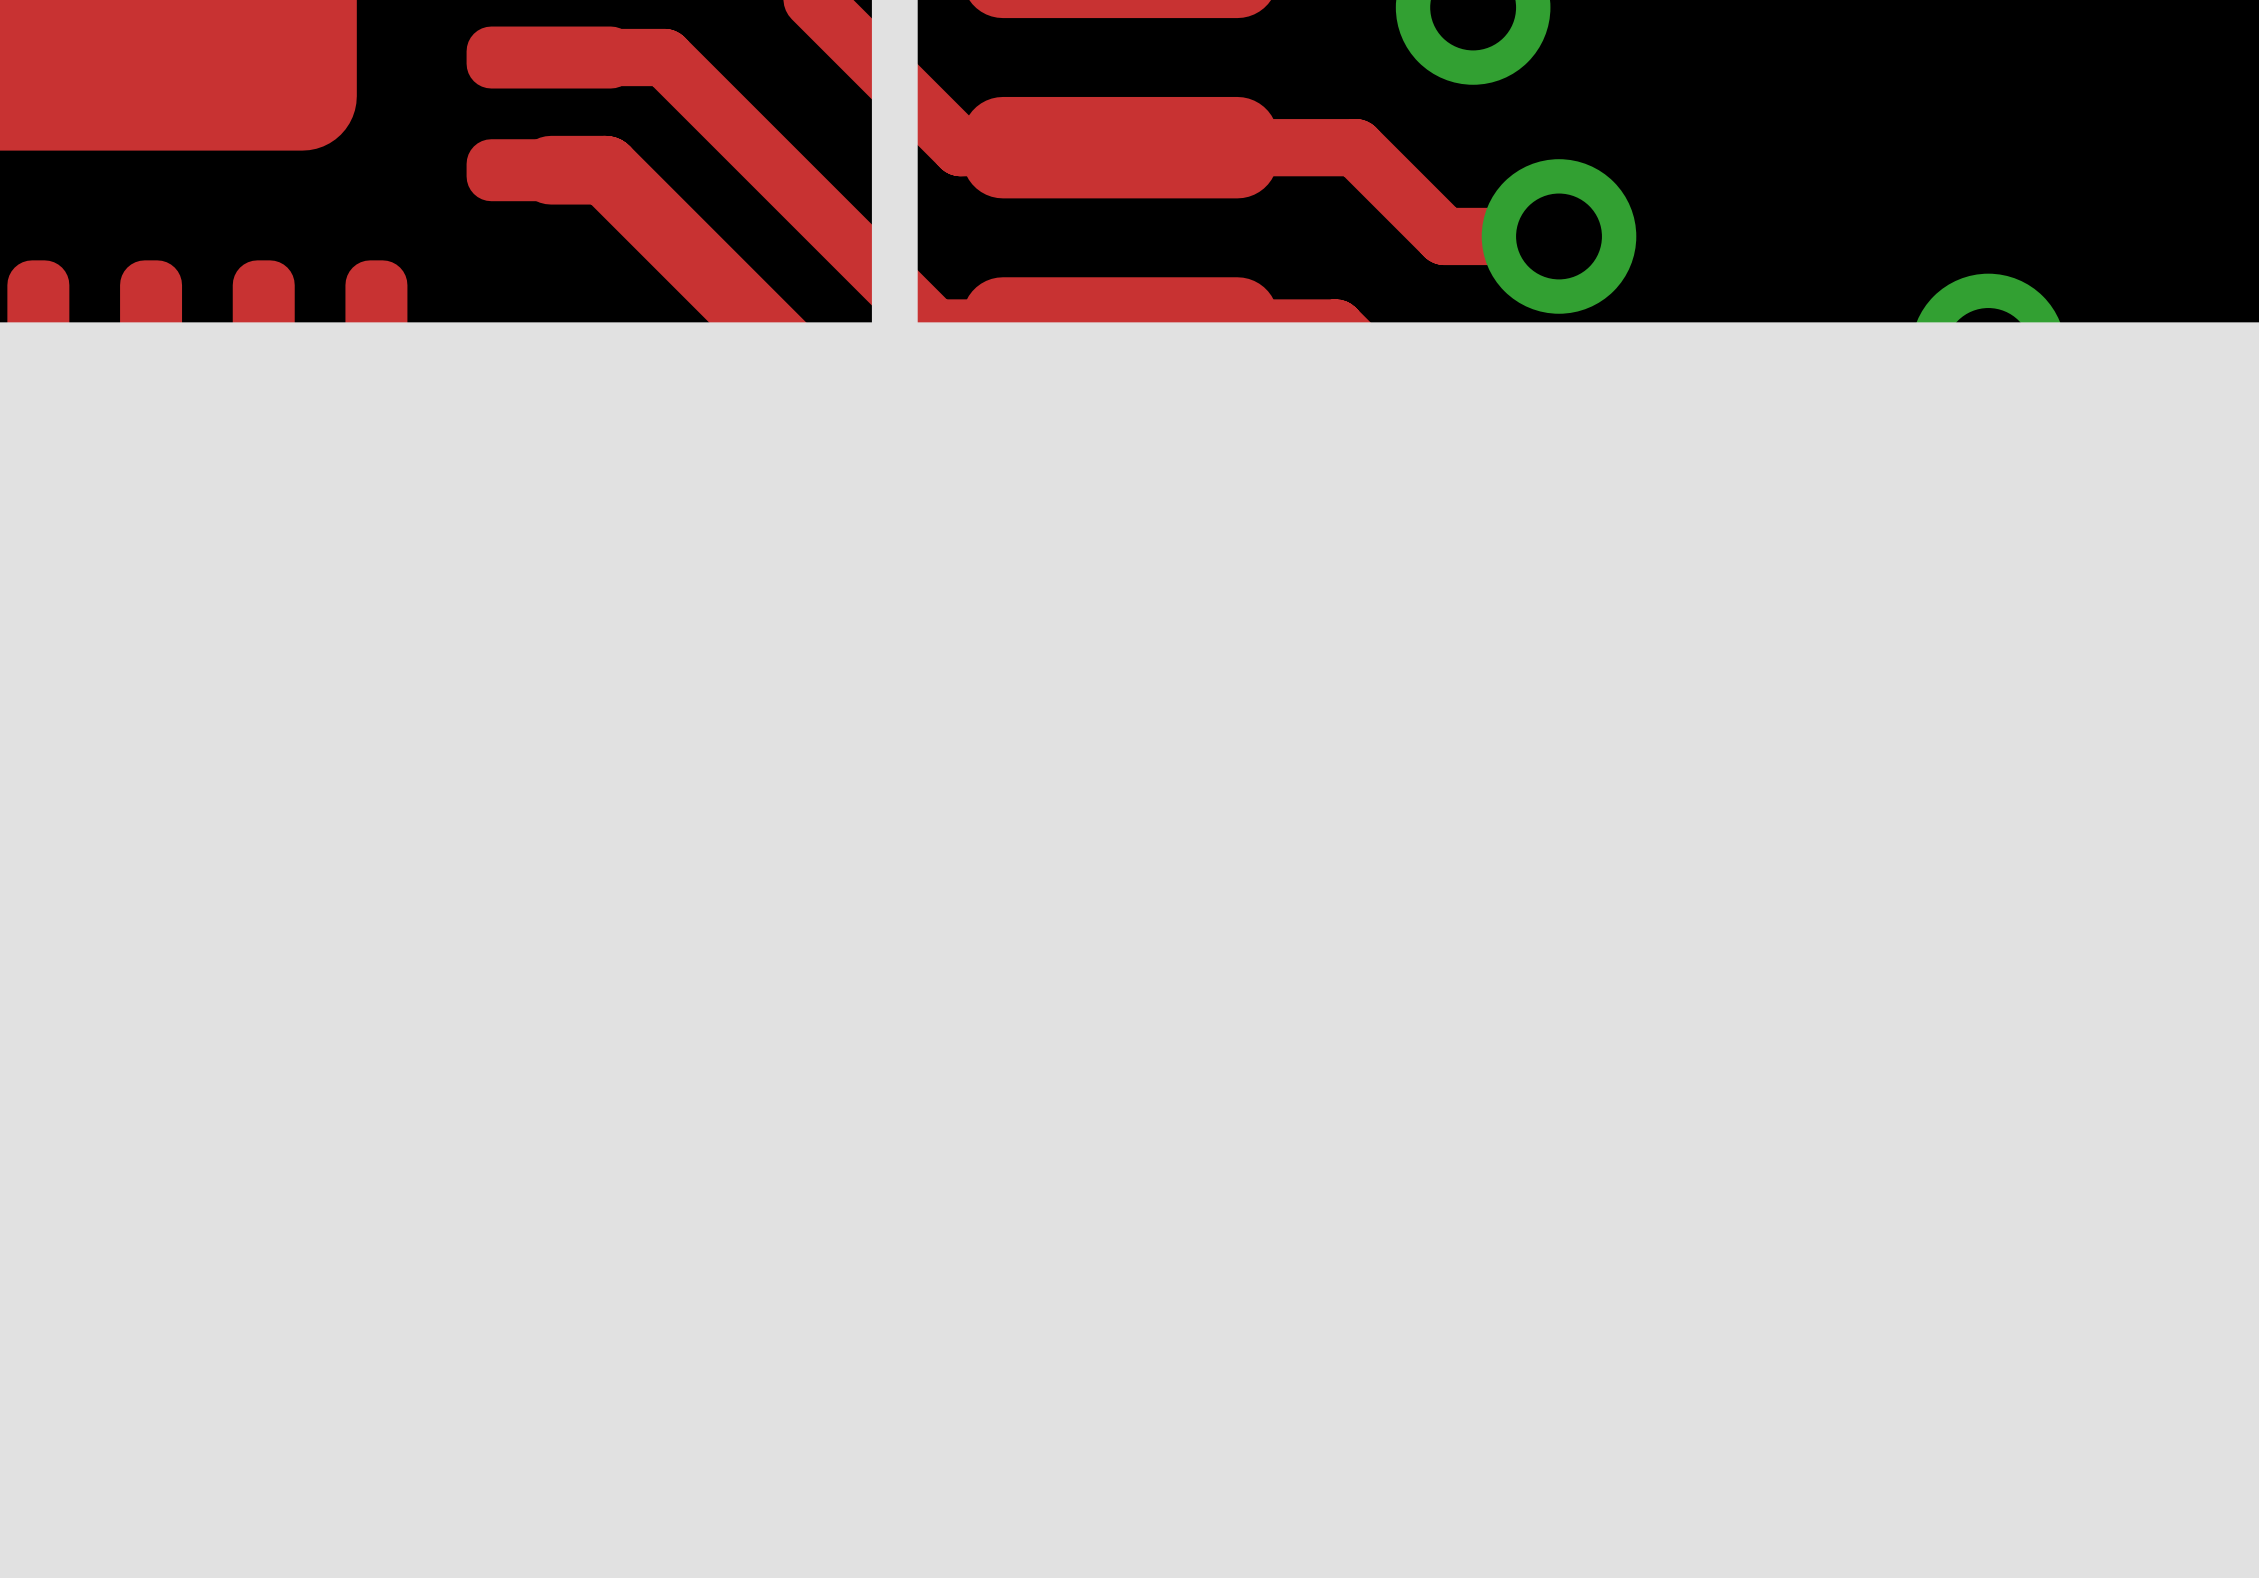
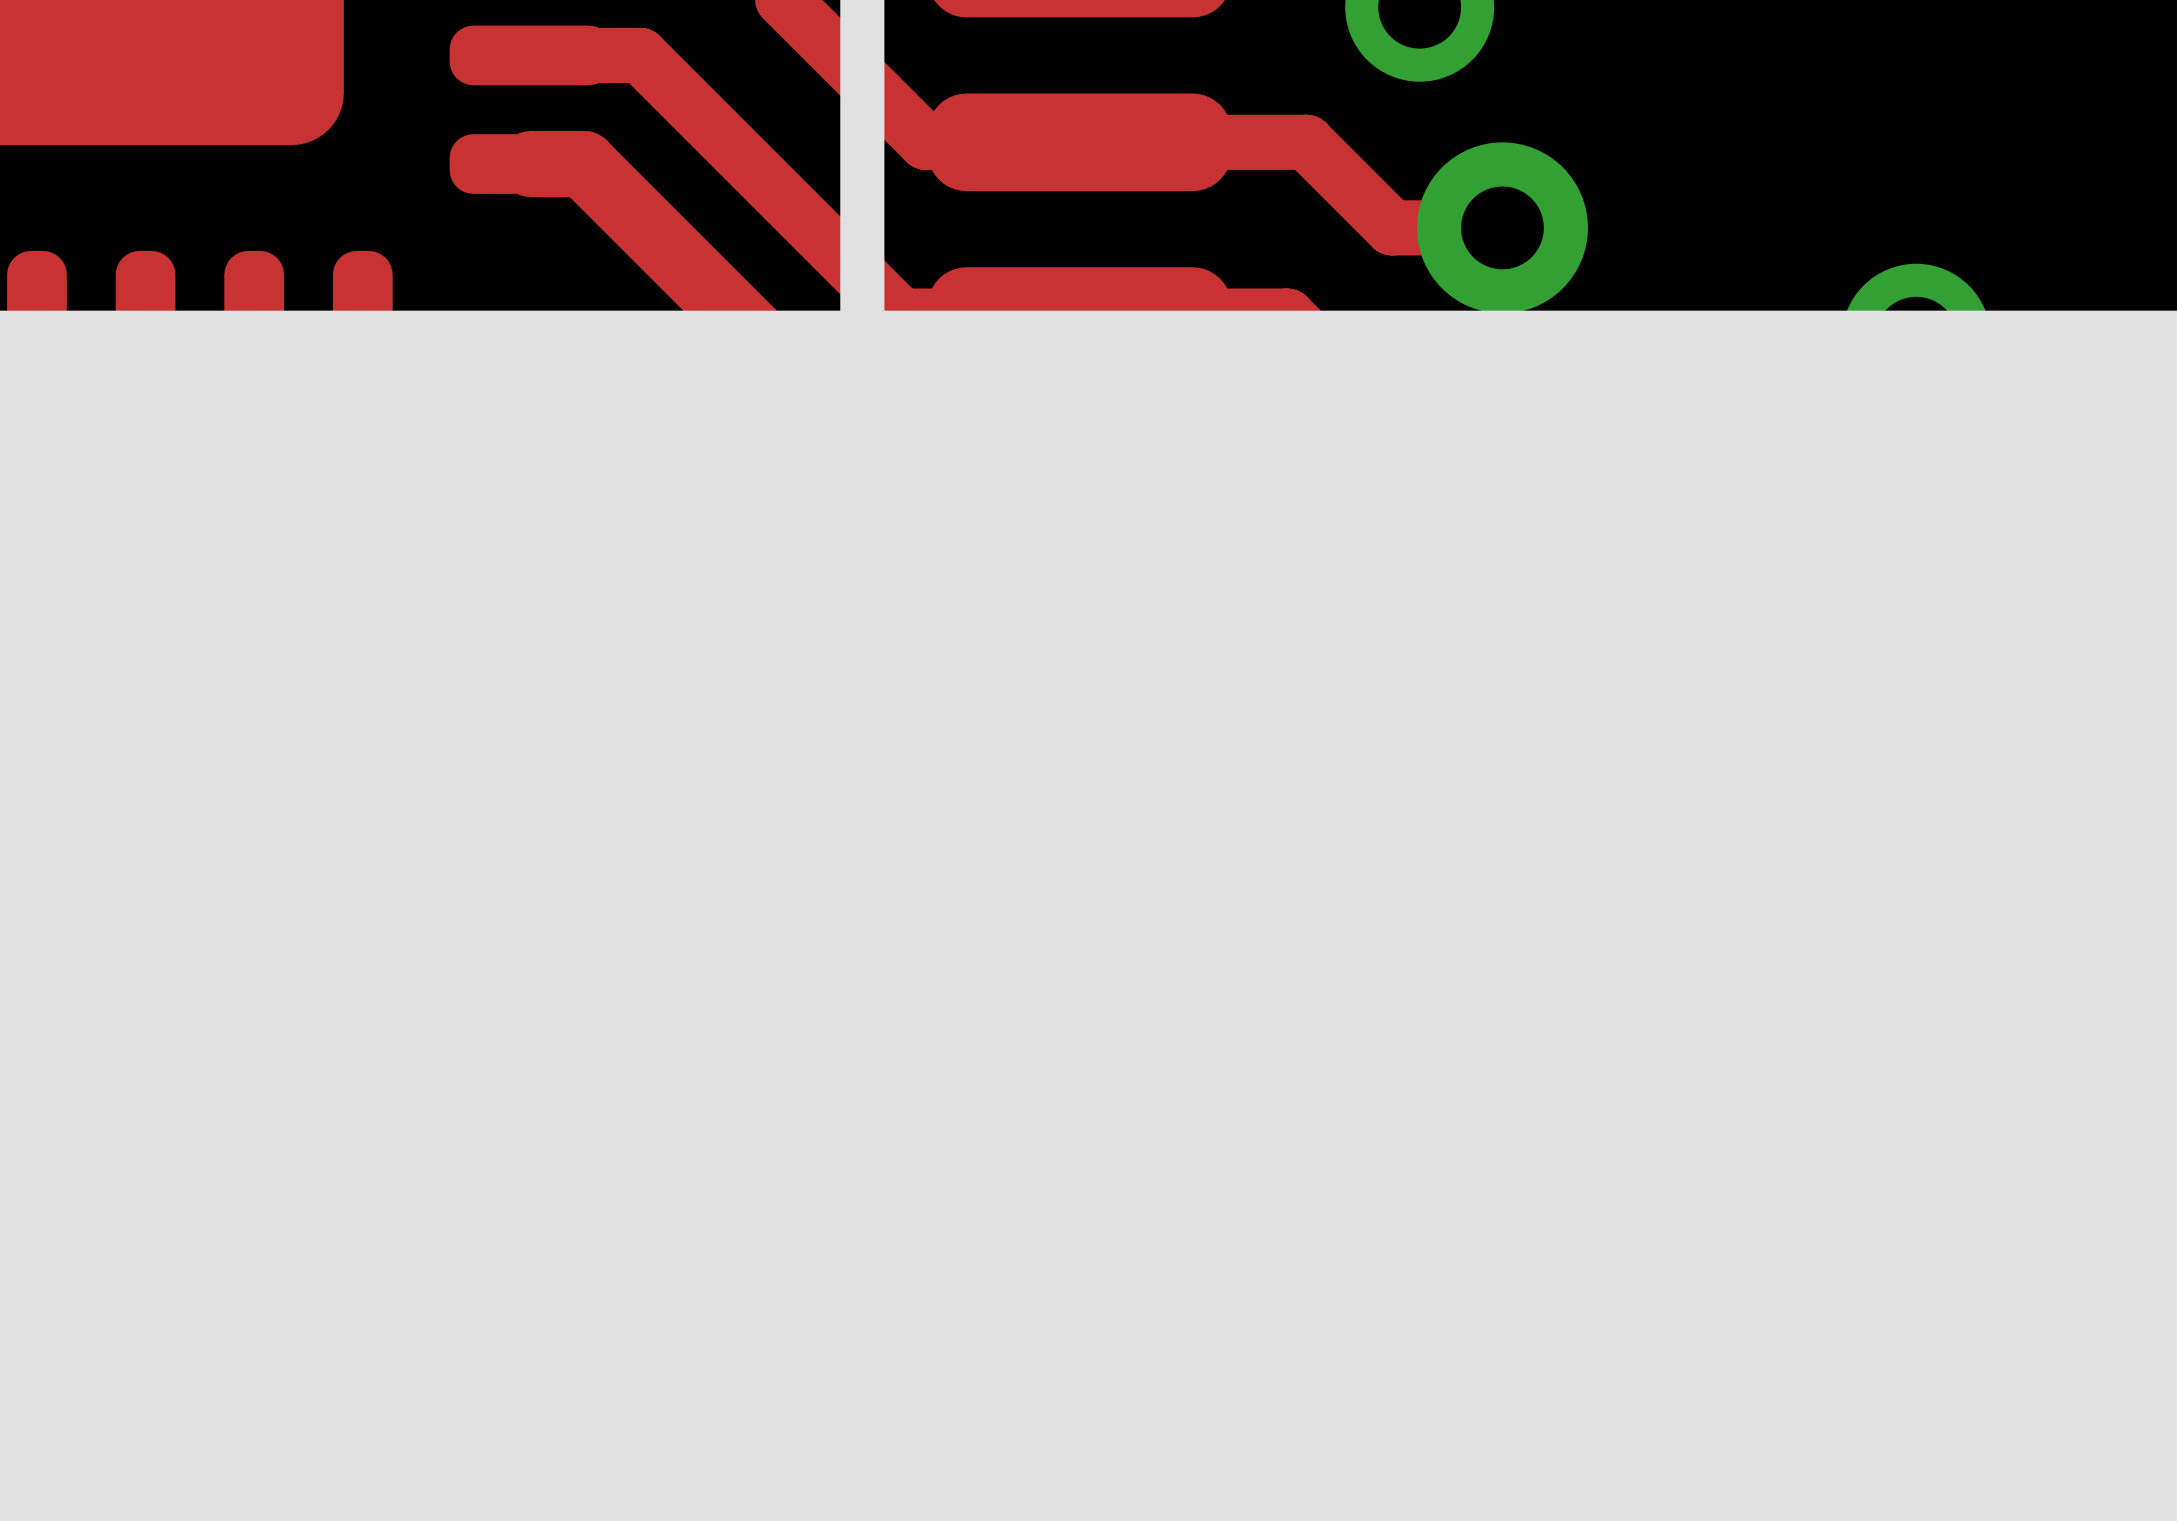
via size: [1481, 159, 1637, 314] -> [1416, 142, 1588, 314]

